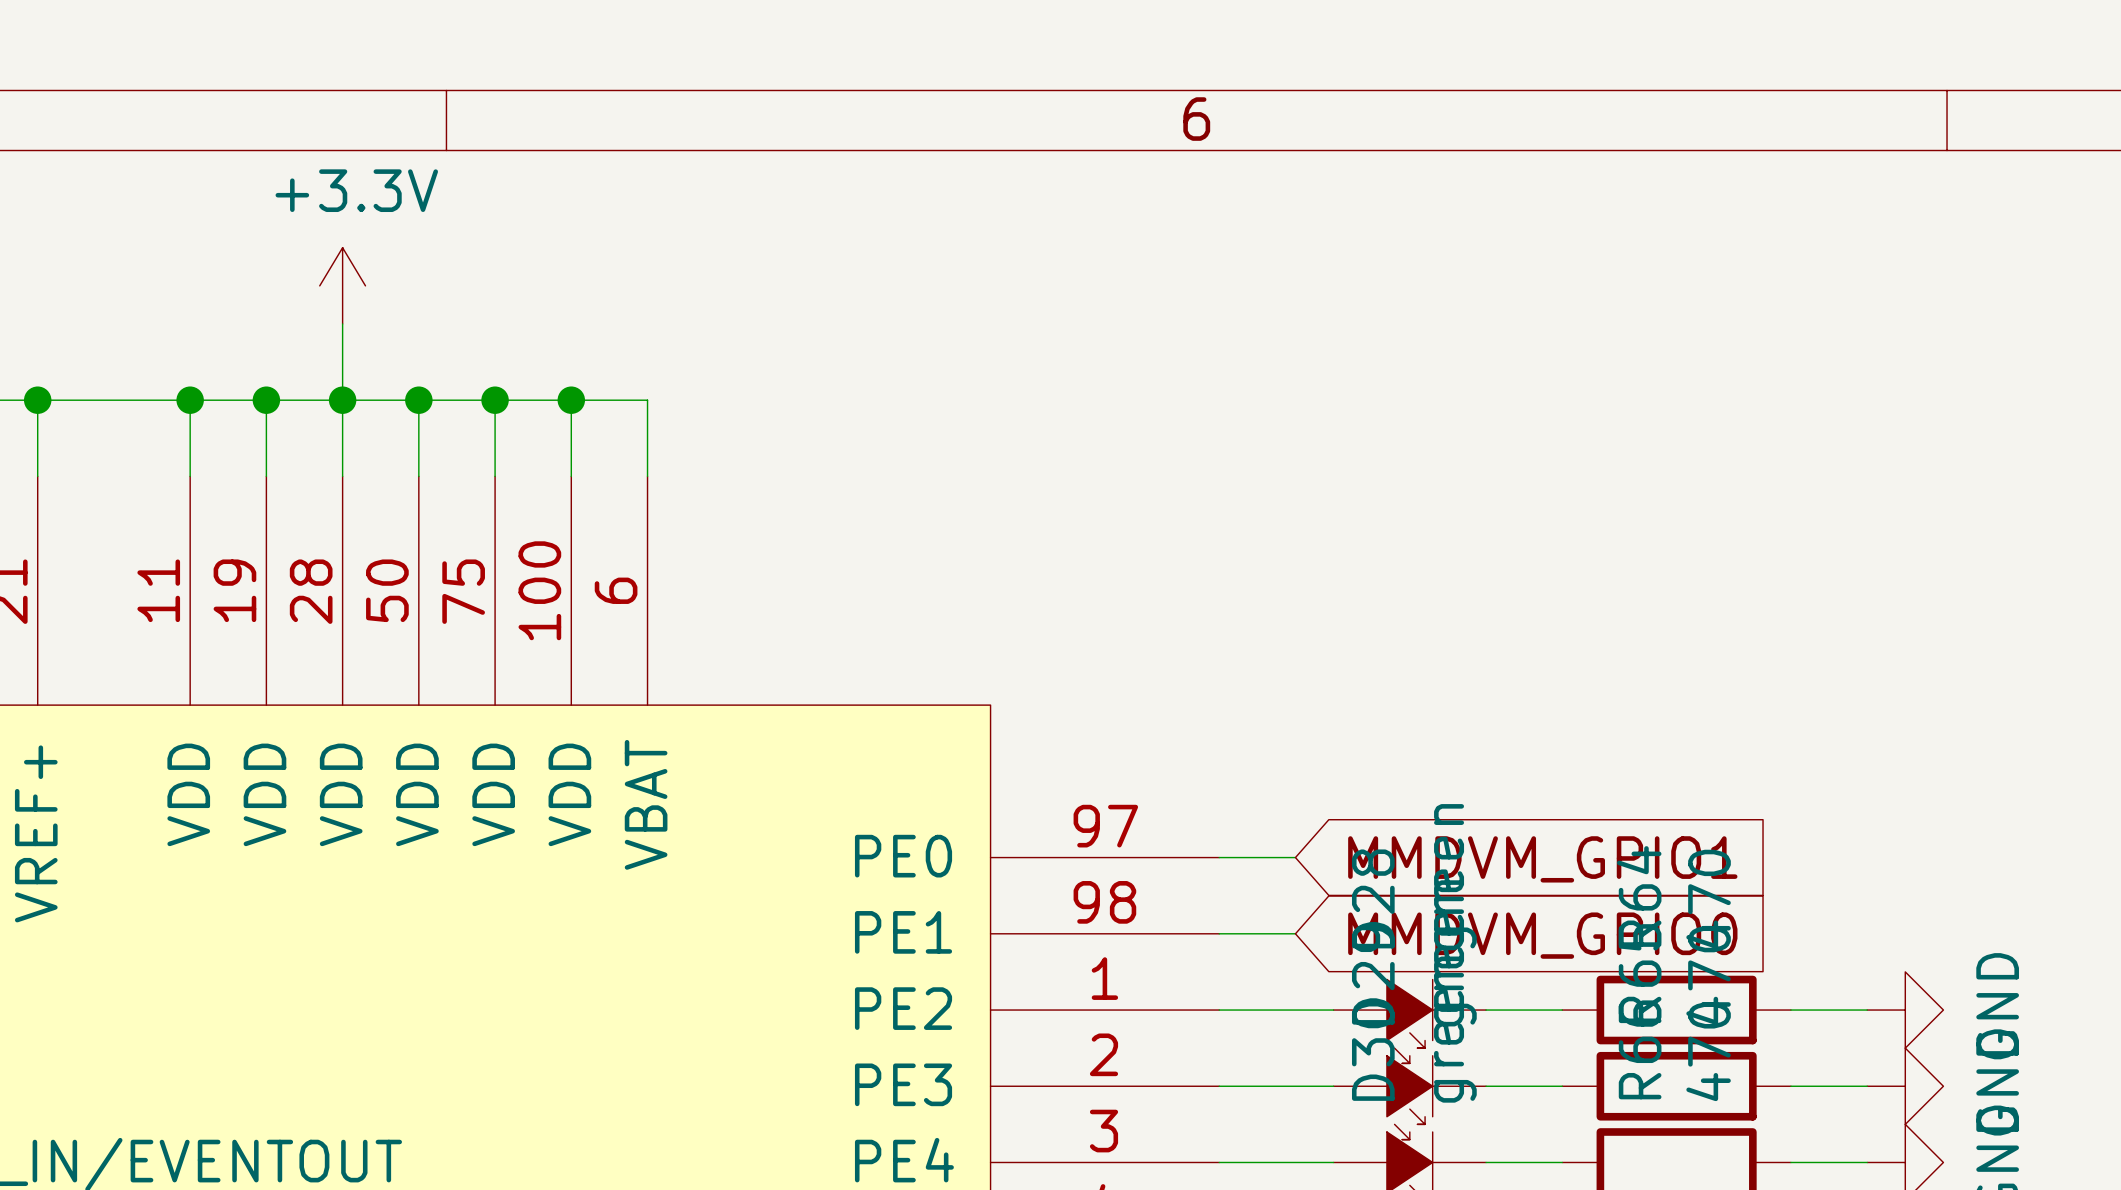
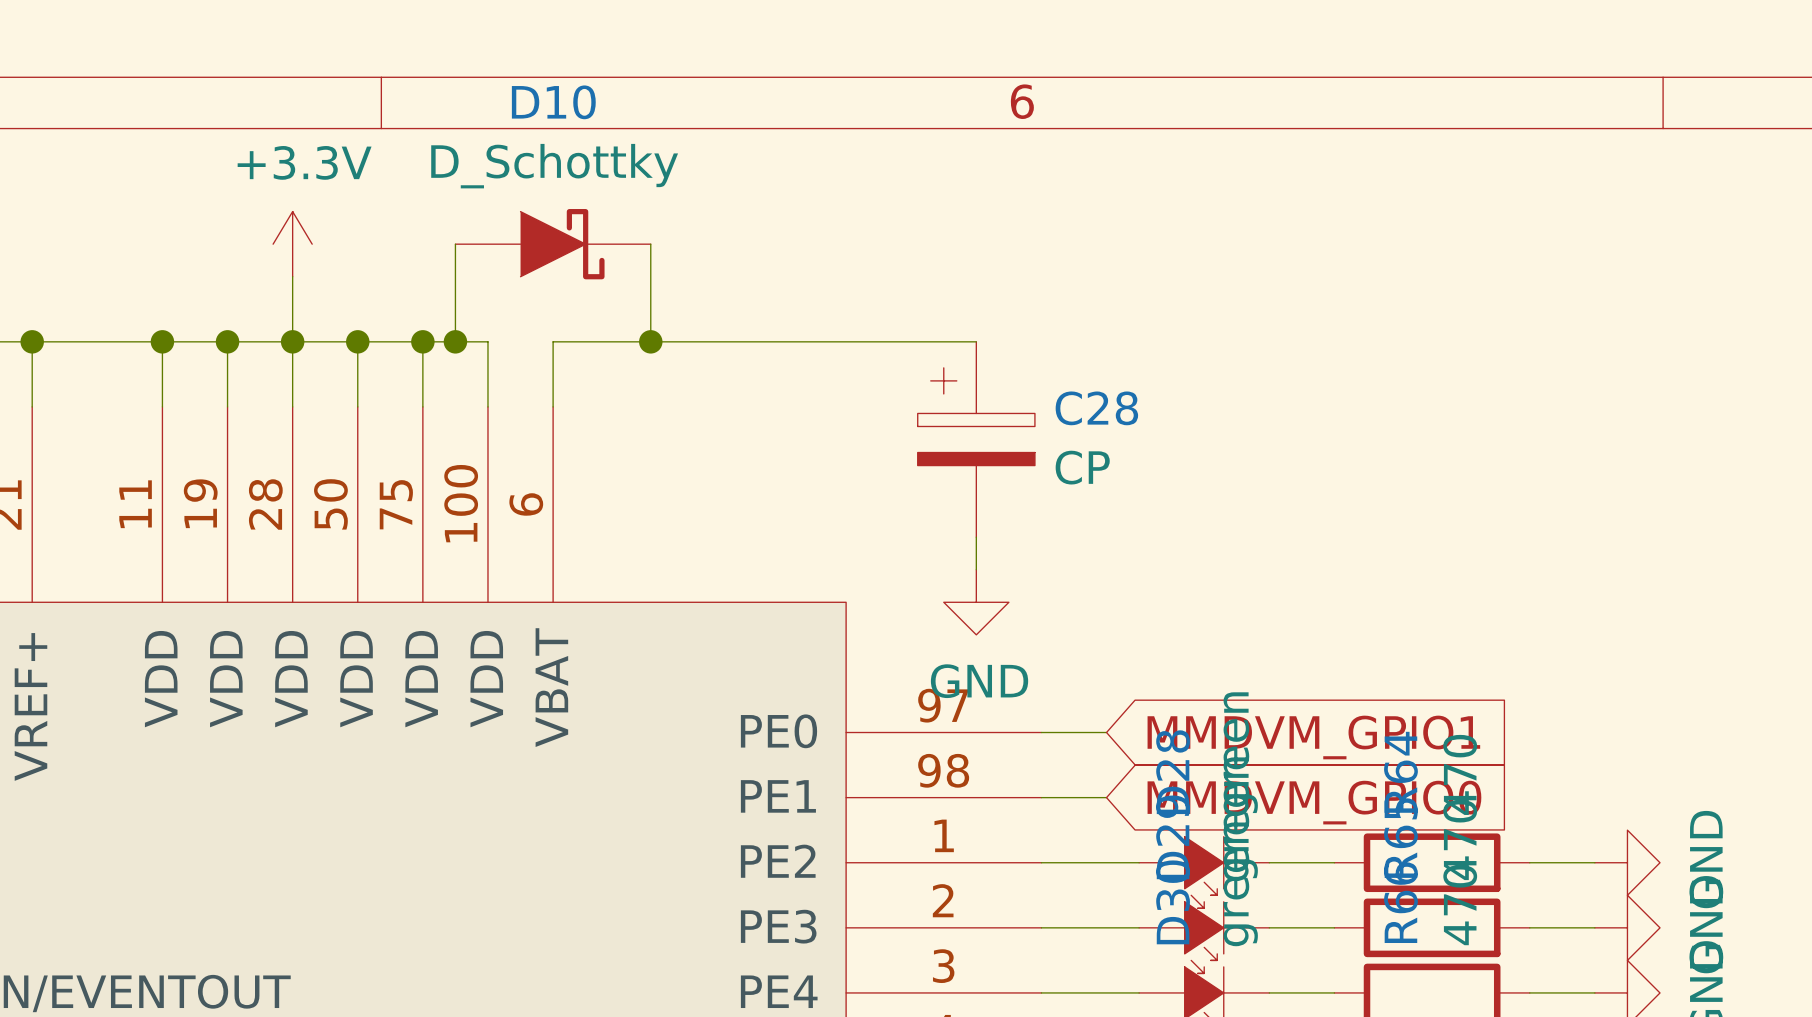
wire: none -> (455, 244) (455, 341)
D10: none -> D_Schottky (553, 244)
wire: none -> (650, 244) (650, 341)
wire: (571, 400) (647, 400) -> (976, 341) (553, 341)
junction position: (571, 400) -> (455, 341)
junction: none -> (650, 341)
C28: none -> CP (976, 439)
wire: none -> (976, 537) (976, 569)
power symbol: none -> GND (976, 602)

